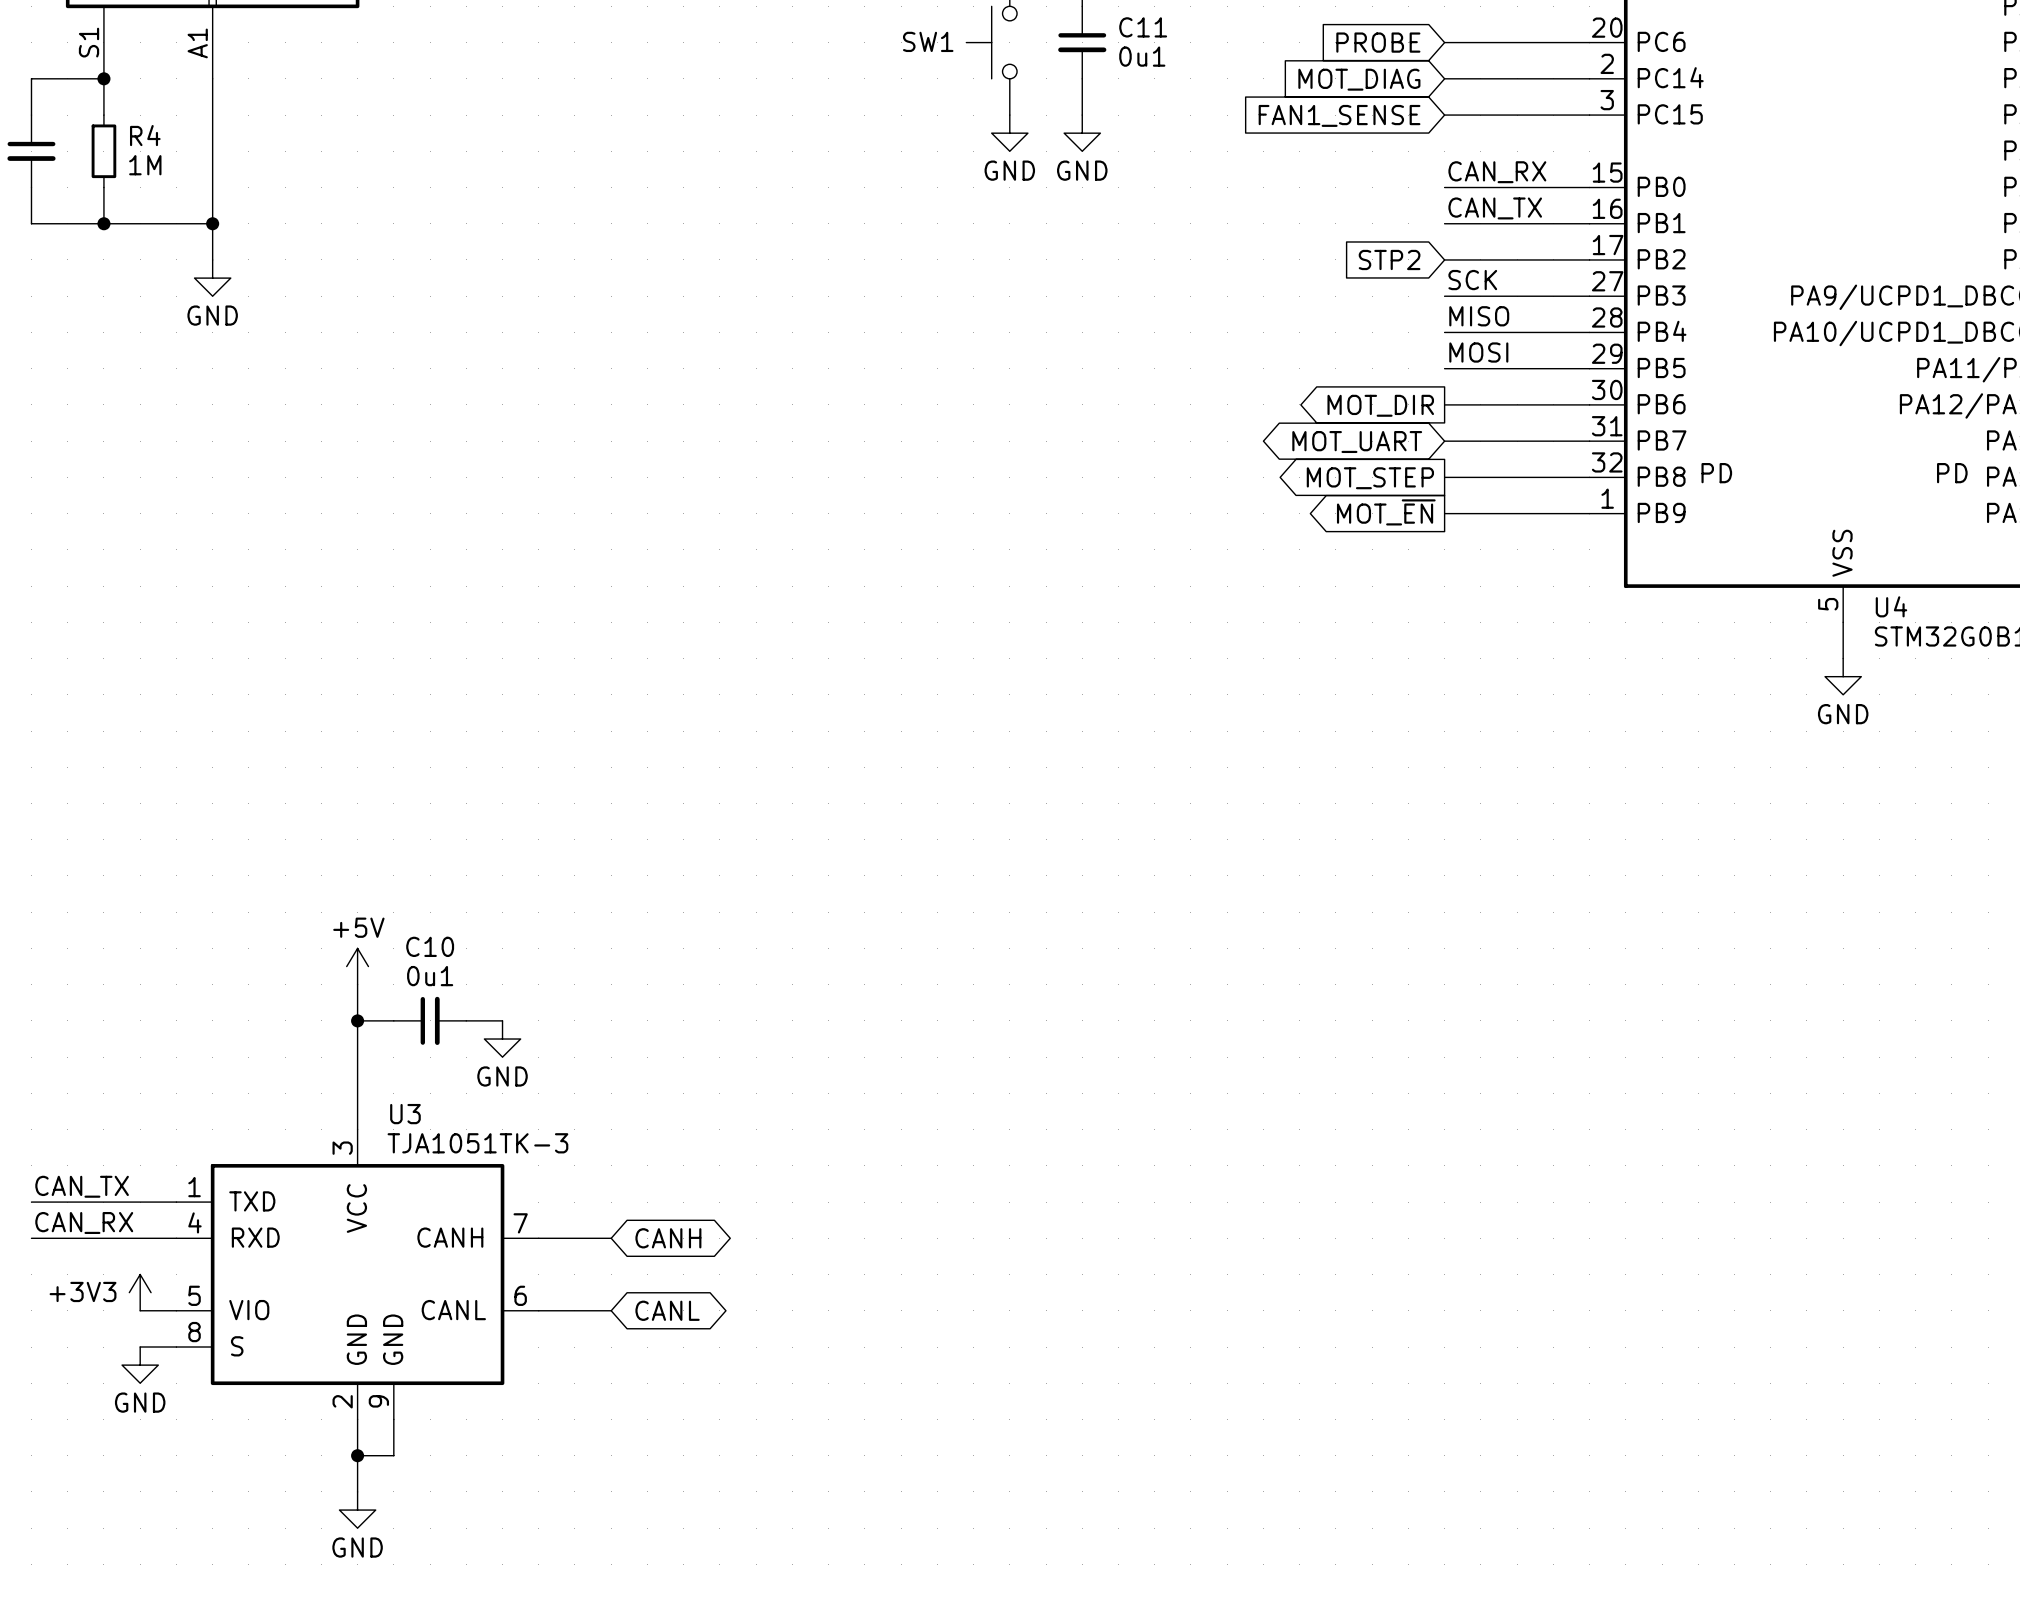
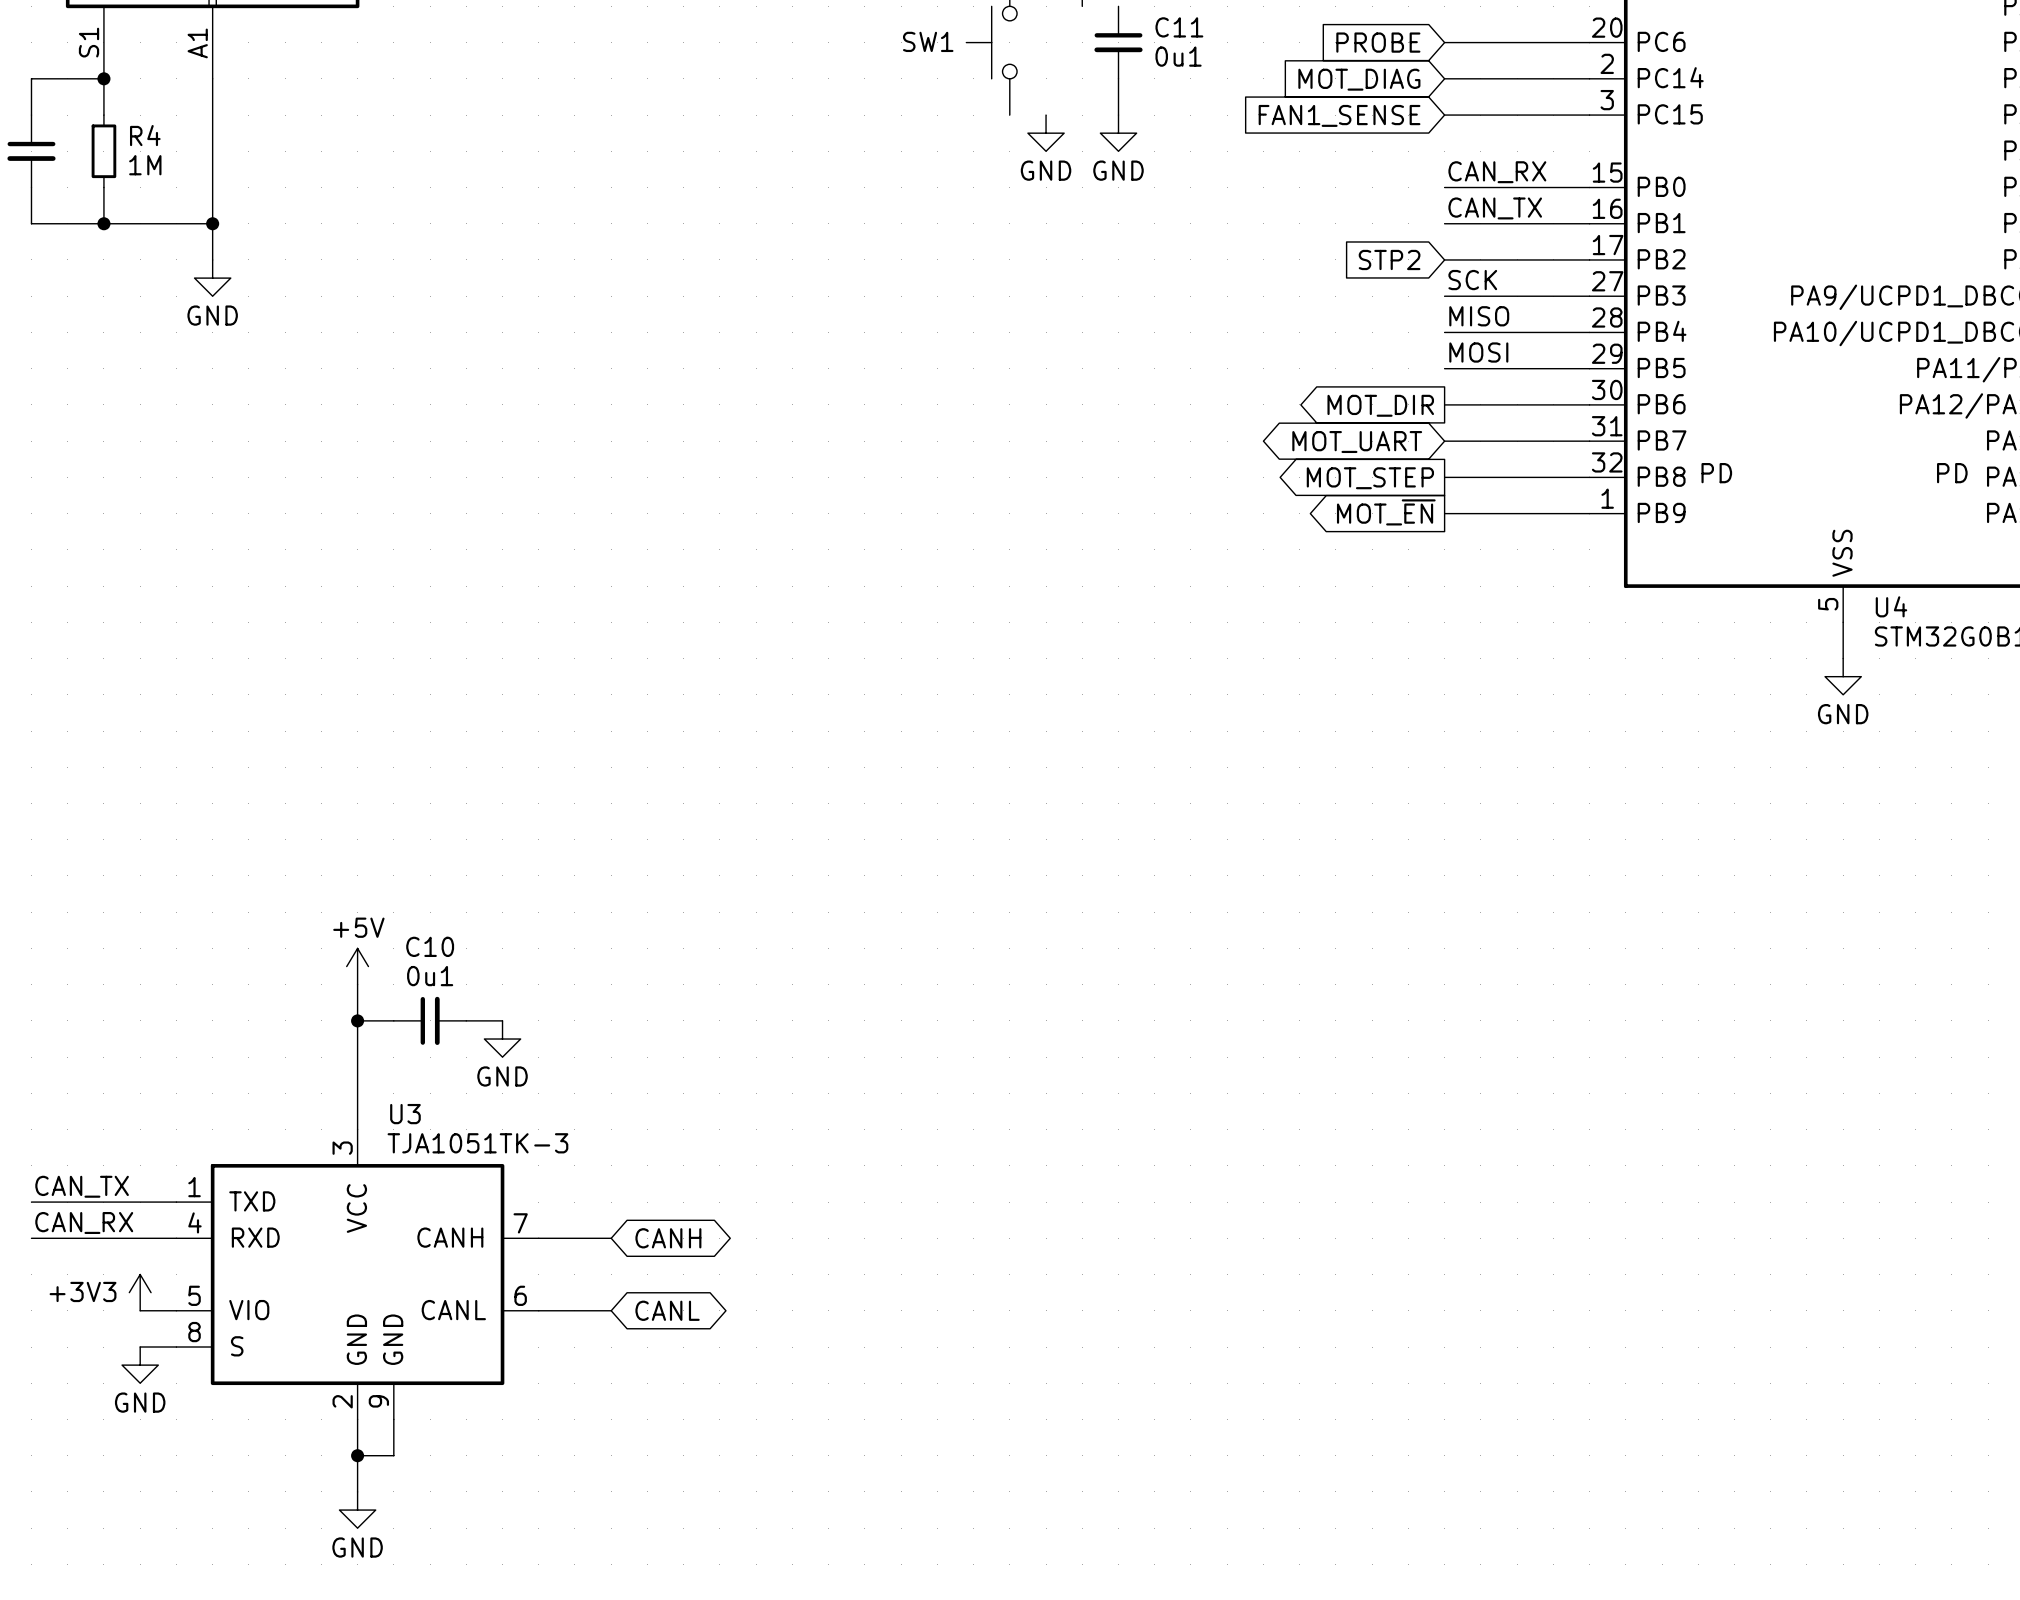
C11 position: (1082, 42) -> (1118, 42)
wire: (1082, 78) (1082, 115) -> (1118, 78) (1118, 115)
power symbol: GND (1009, 133) -> none
power symbol: none -> GND (1046, 133)
power symbol: GND (1082, 133) -> none
power symbol: none -> GND (1118, 133)

